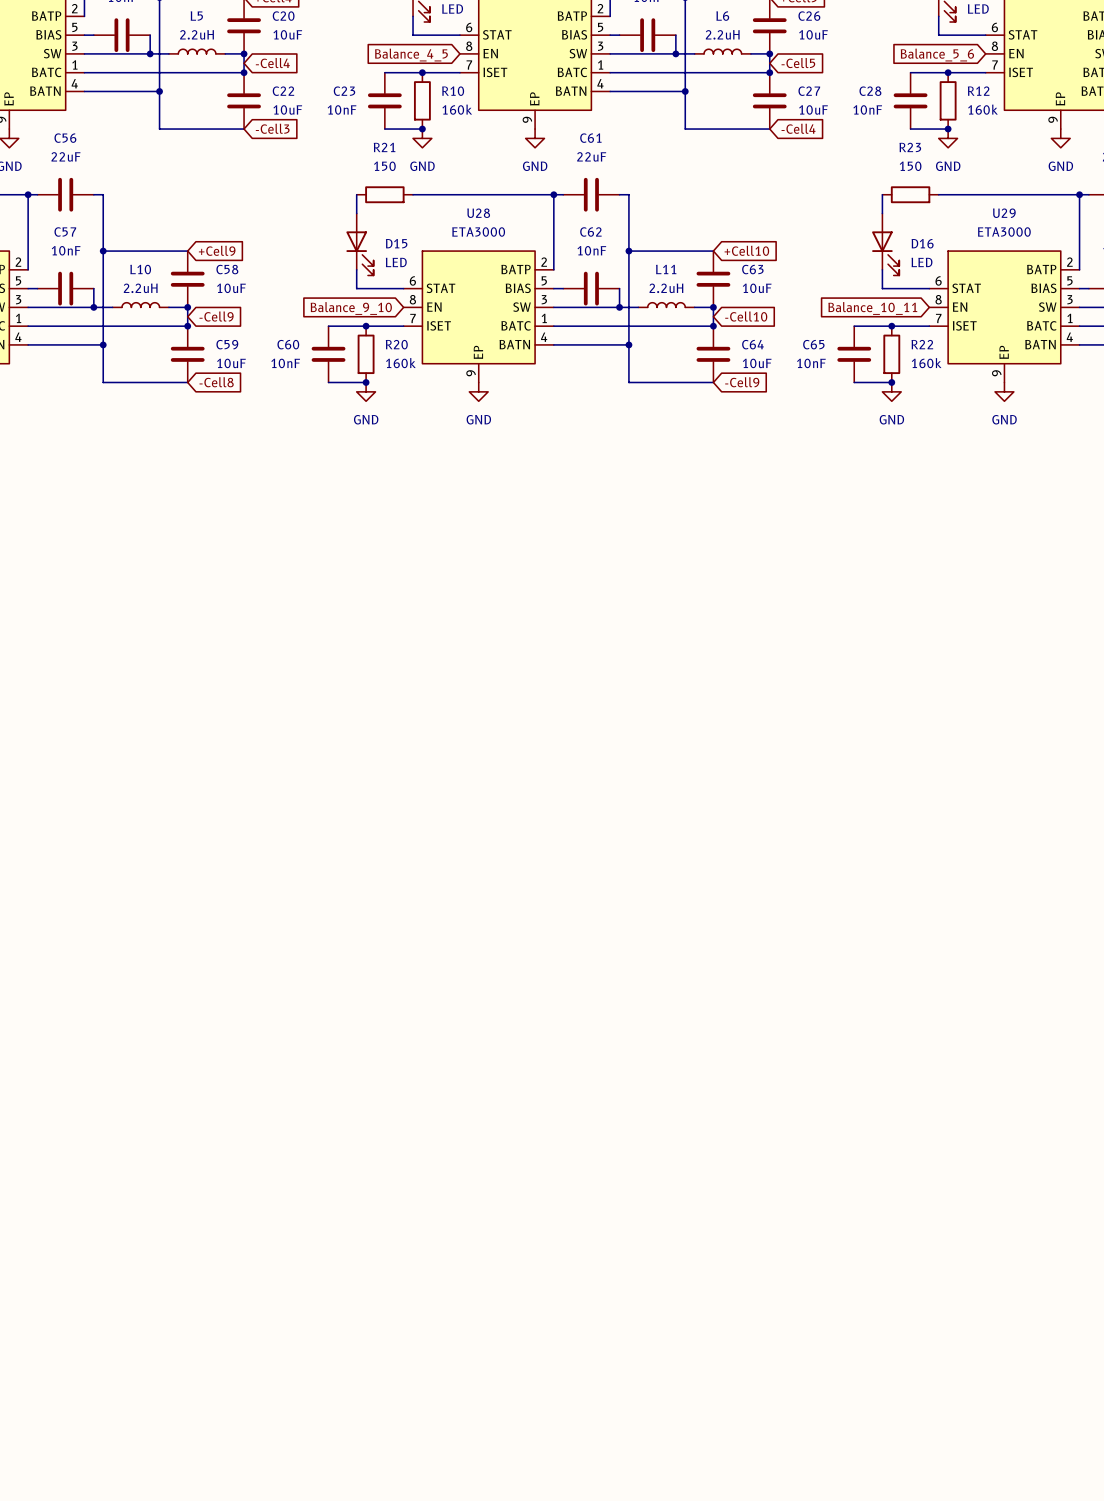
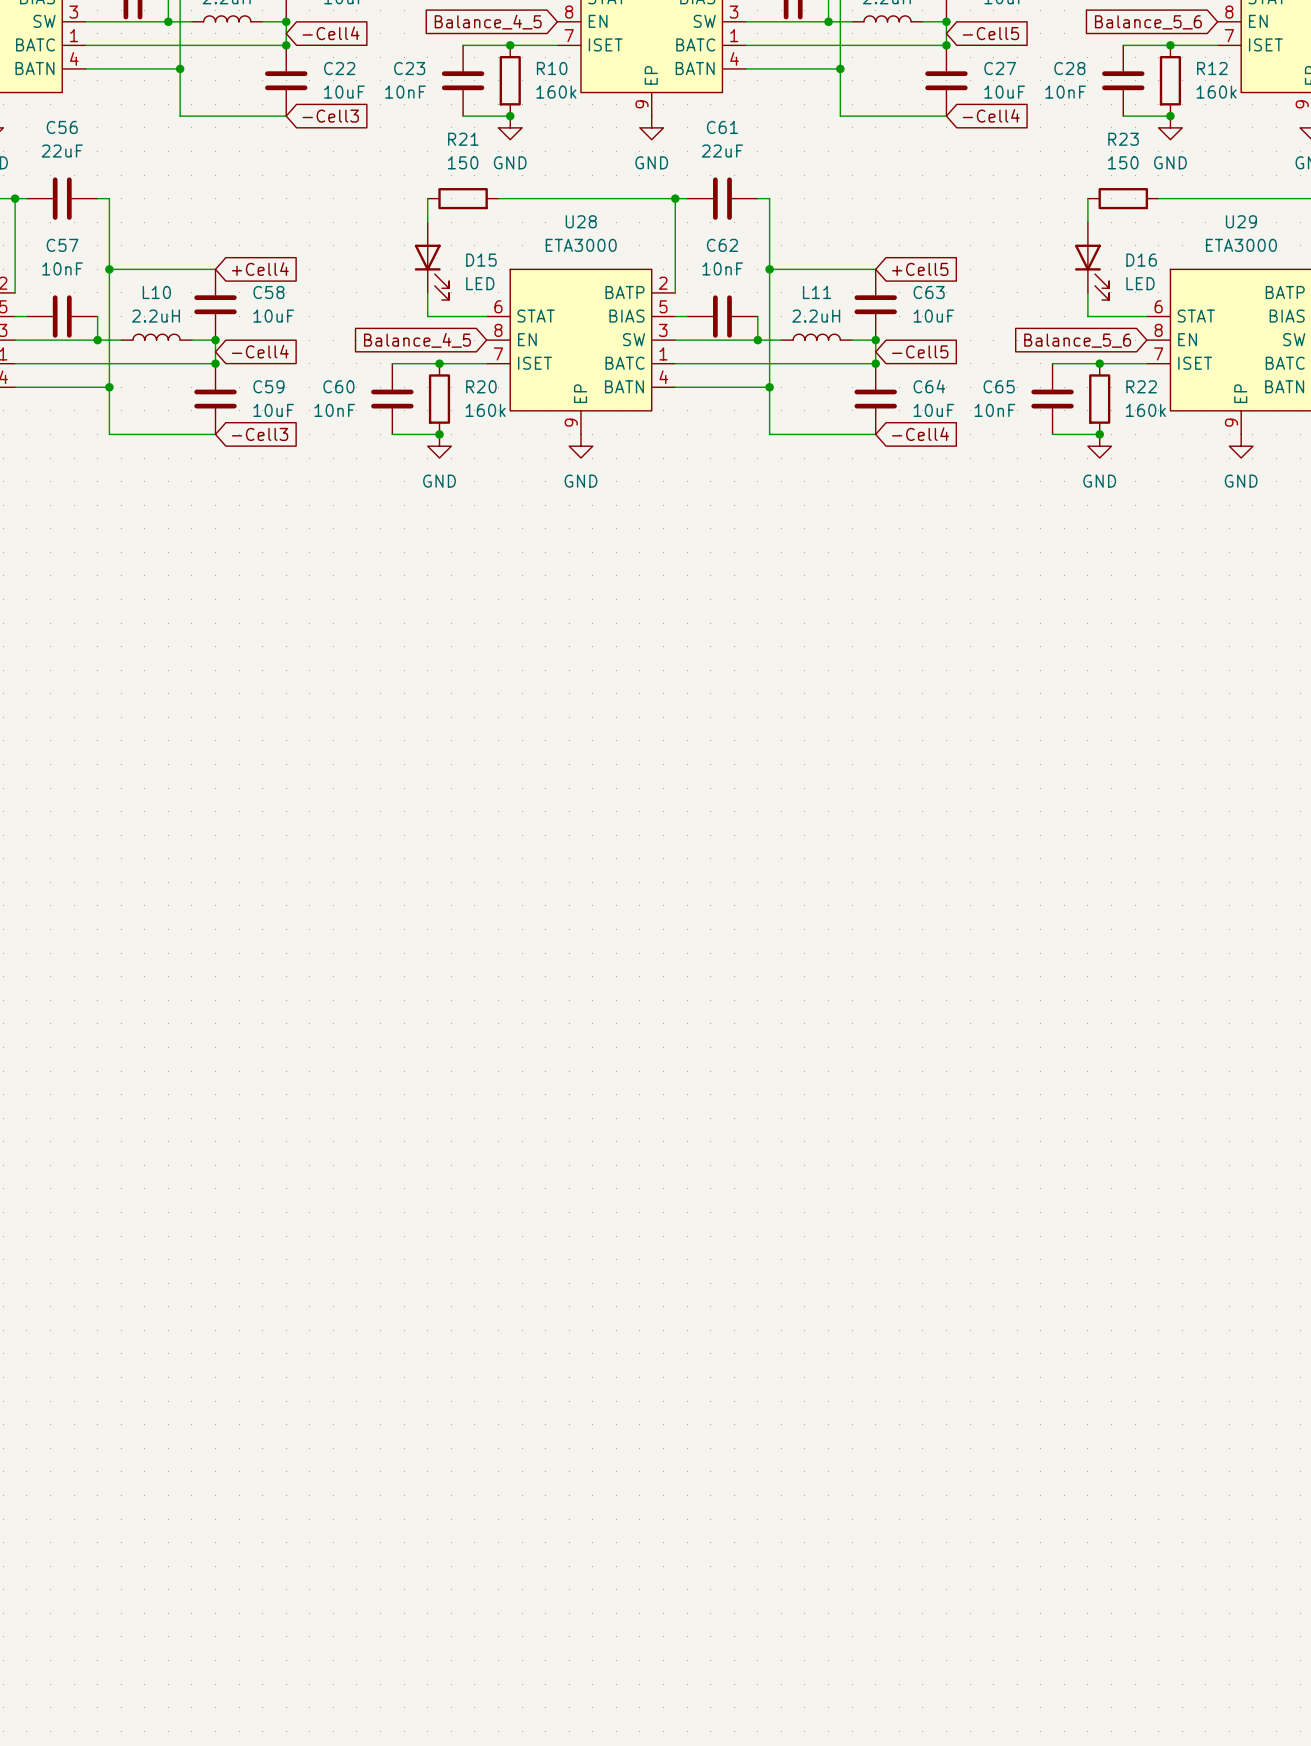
global label: +Cell9 (217, 250) -> +Cell4 (260, 269)
global label: +Cell10 (746, 250) -> +Cell5 (920, 269)
global label: Balance_9_10 (351, 308) -> Balance_4_5 (417, 340)
global label: Balance_10_11 (872, 308) -> Balance_5_6 (1077, 340)
global label: -Cell9 (216, 316) -> -Cell4 (260, 351)
global label: -Cell10 (746, 316) -> -Cell5 (920, 351)
global label: -Cell8 (216, 382) -> -Cell3 (260, 434)
global label: -Cell9 (742, 382) -> -Cell4 (920, 434)

